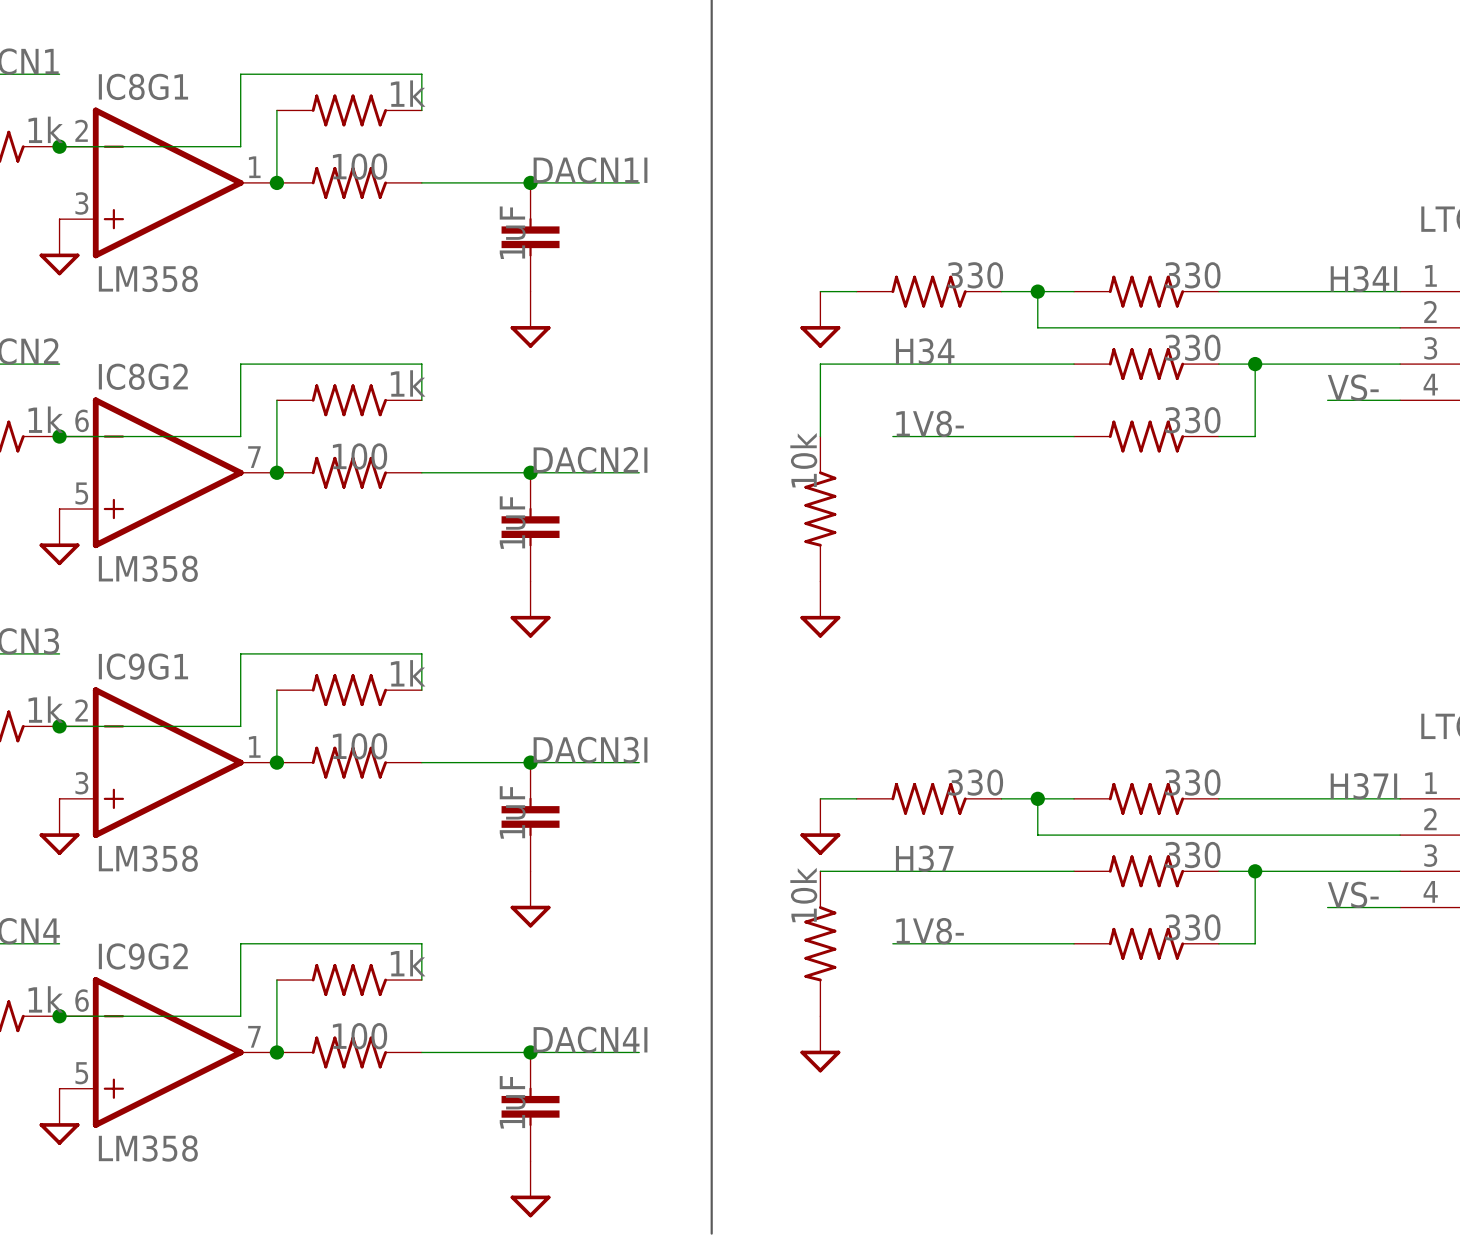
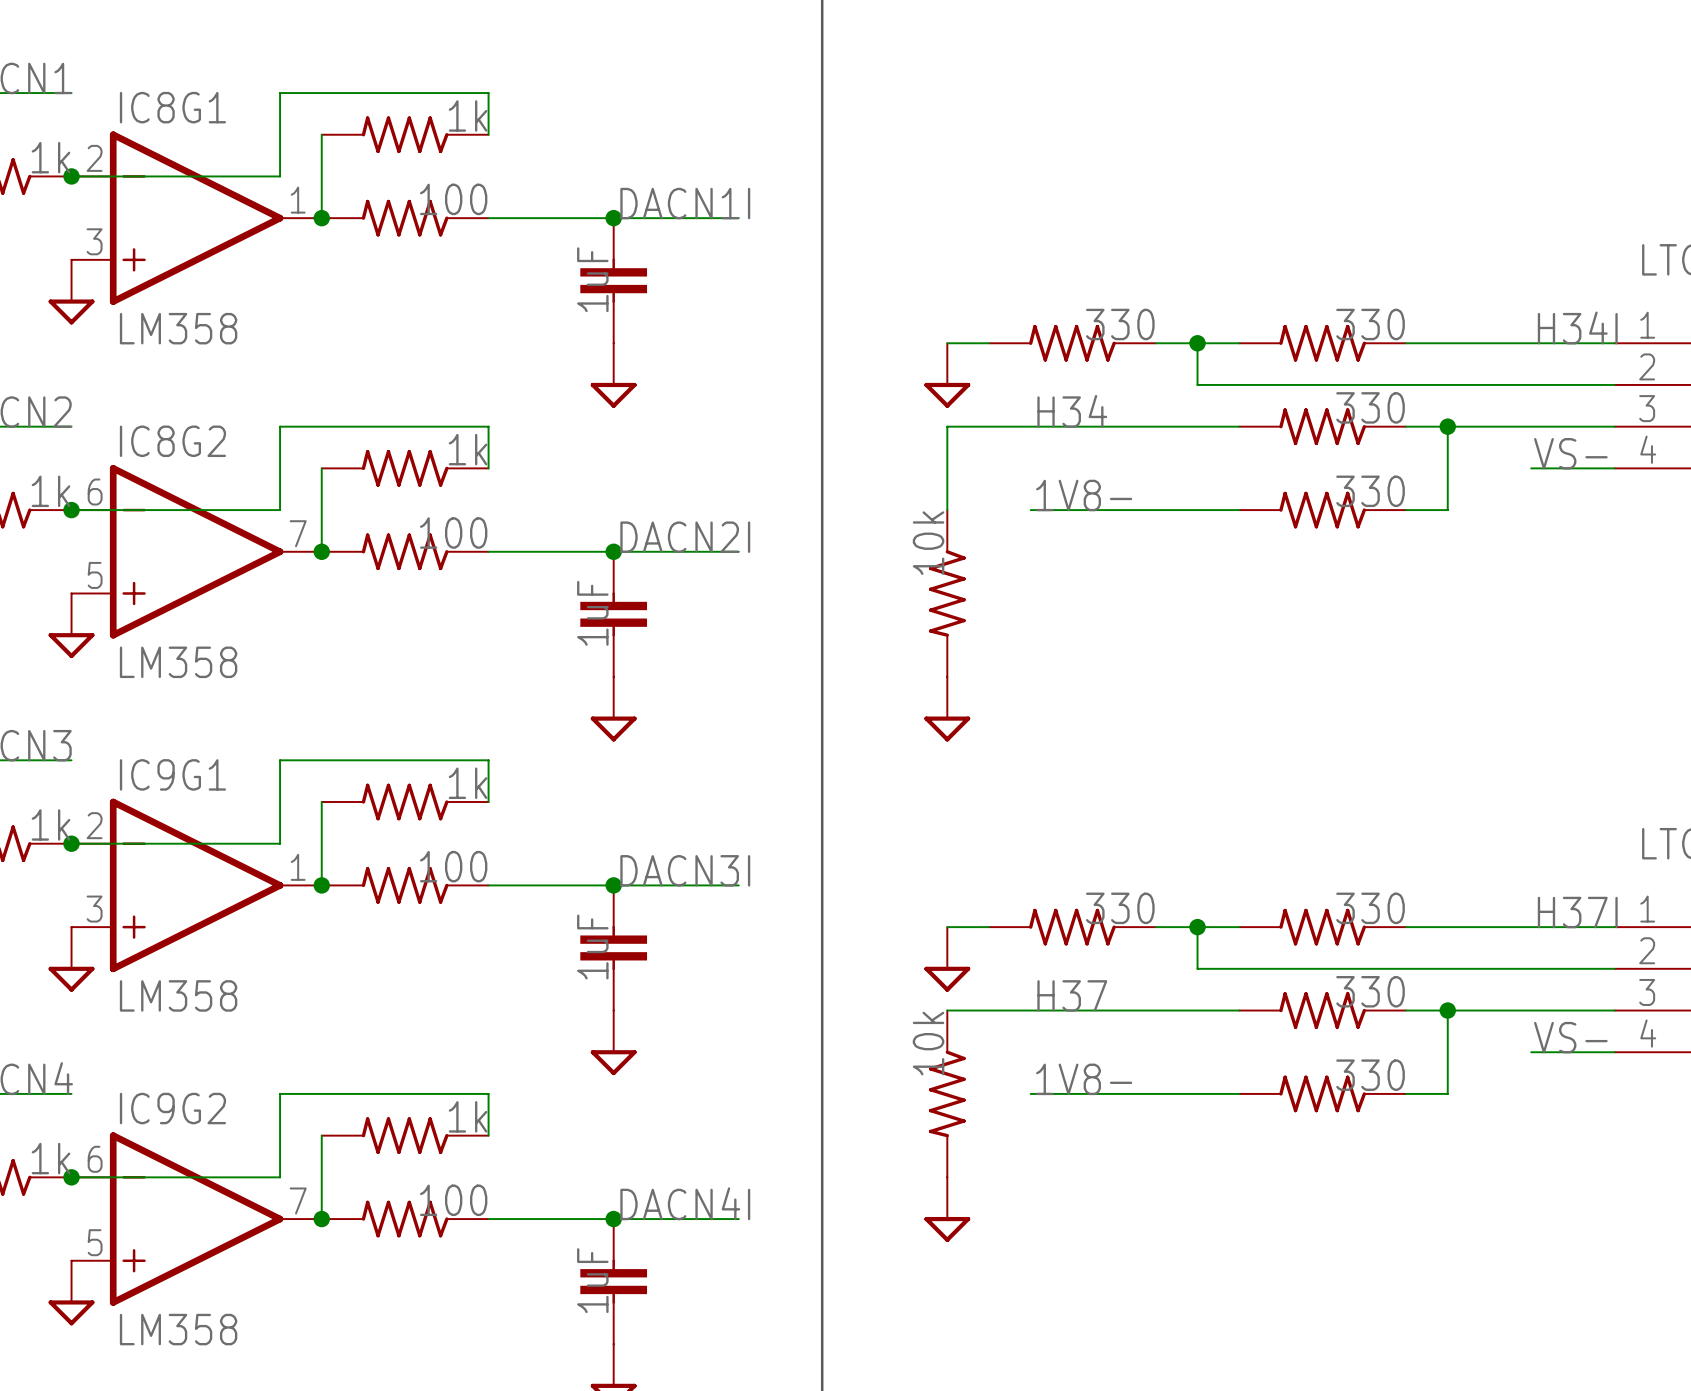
part value position: 100 (360, 166) -> 100 (453, 199)
part value position: 100 (360, 456) -> 100 (453, 533)
part value position: 100 (360, 746) -> 100 (453, 866)
part value position: 100 (360, 1036) -> 100 (453, 1200)

